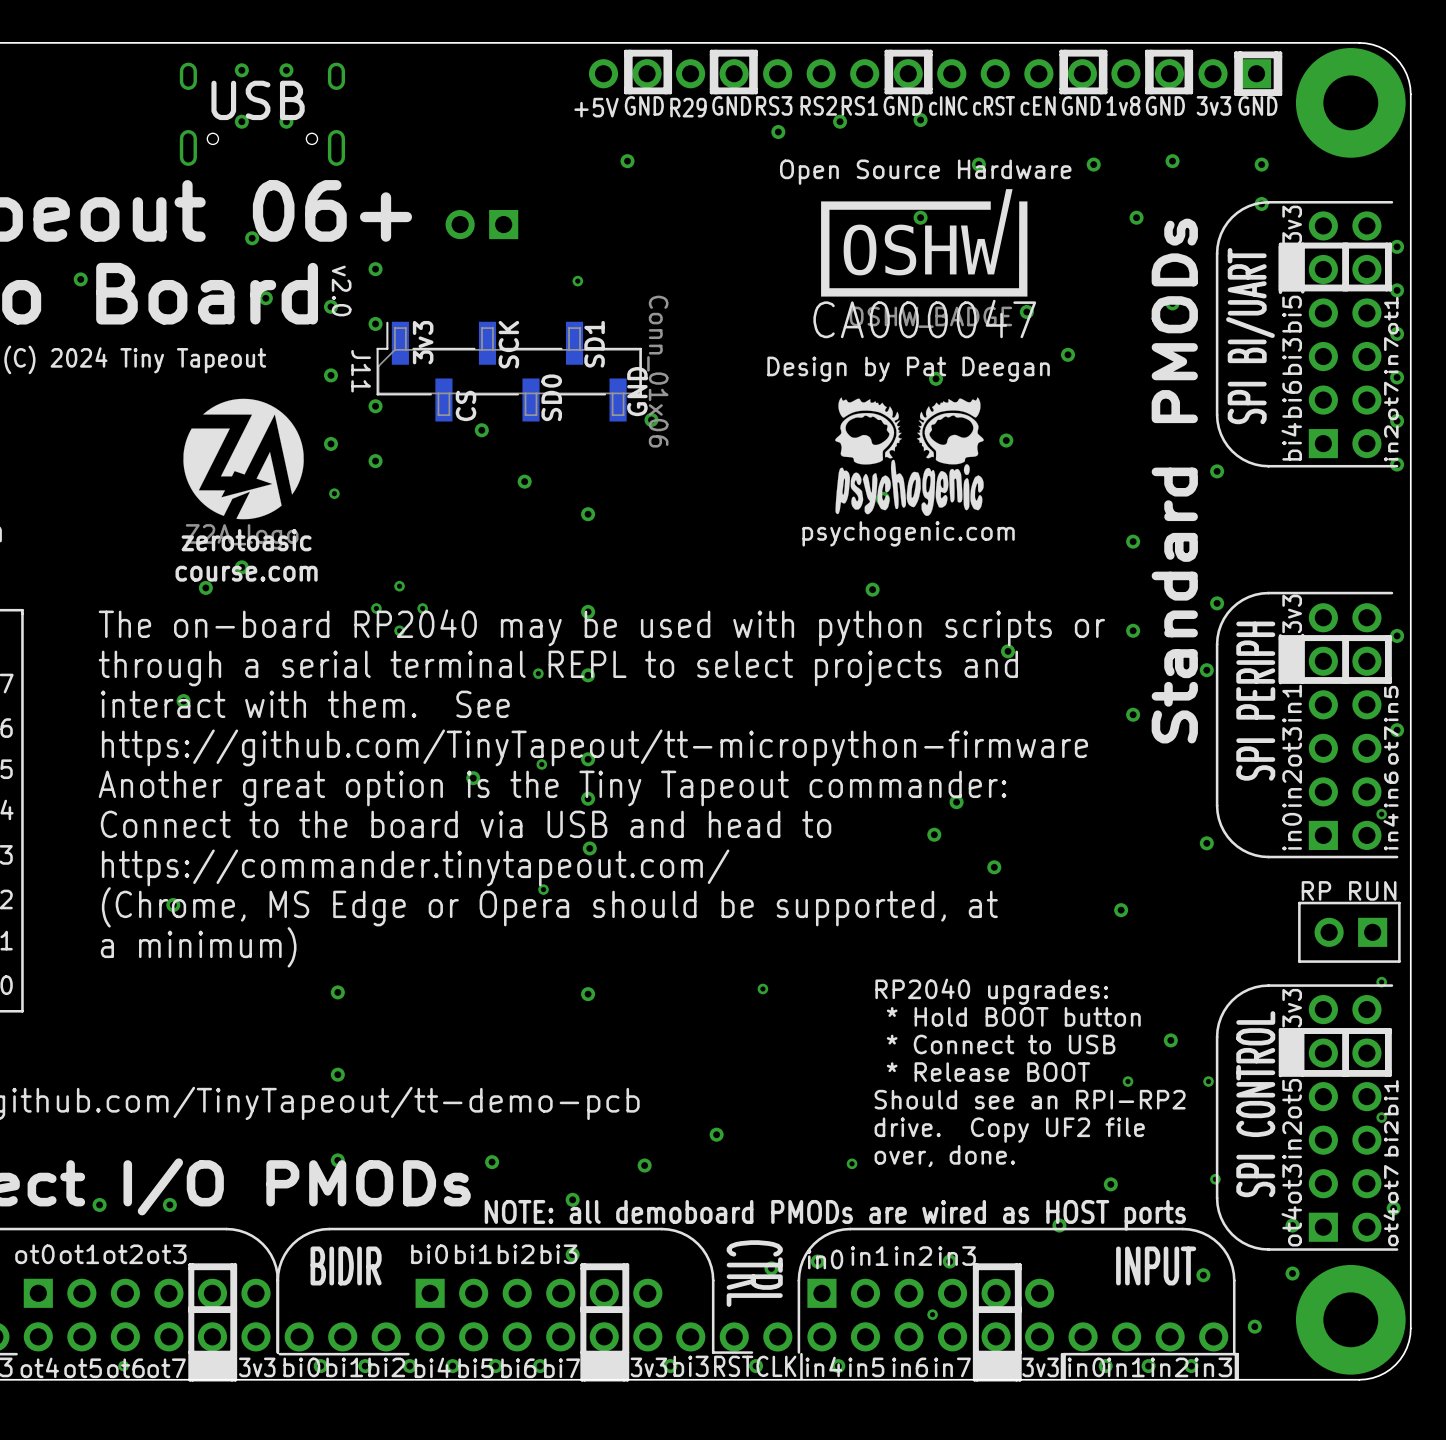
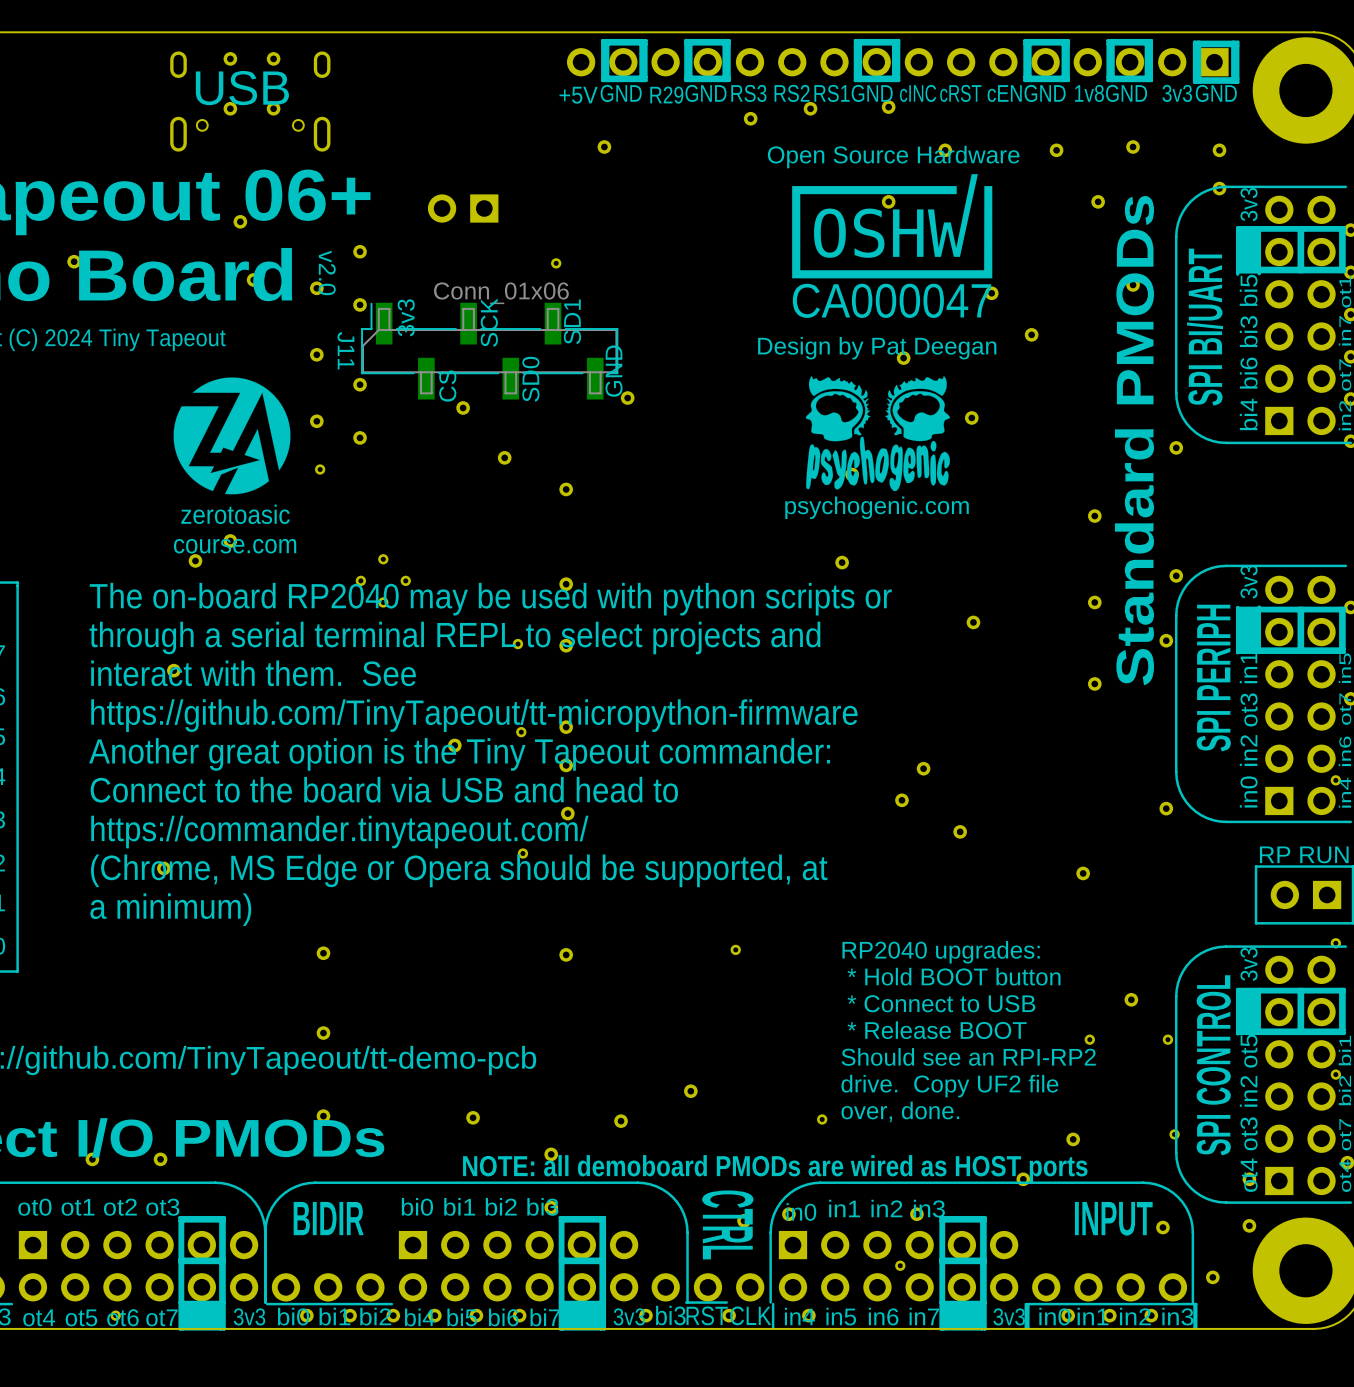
drawing shape: [821, 189, 1028, 328] -> [792, 174, 993, 279]
J11 value rotation: 0° (657, 371) -> 90° counterclockwise (501, 293)
drawing shape: [183, 398, 304, 550] -> [173, 377, 291, 495]

